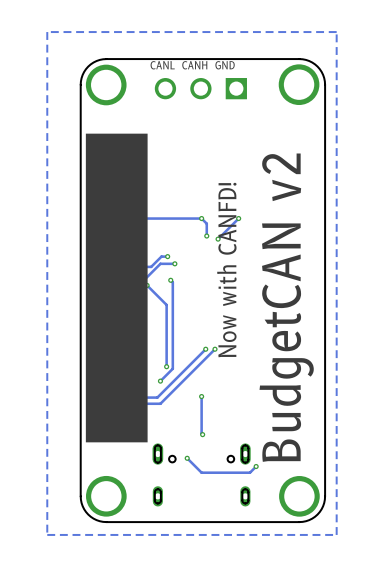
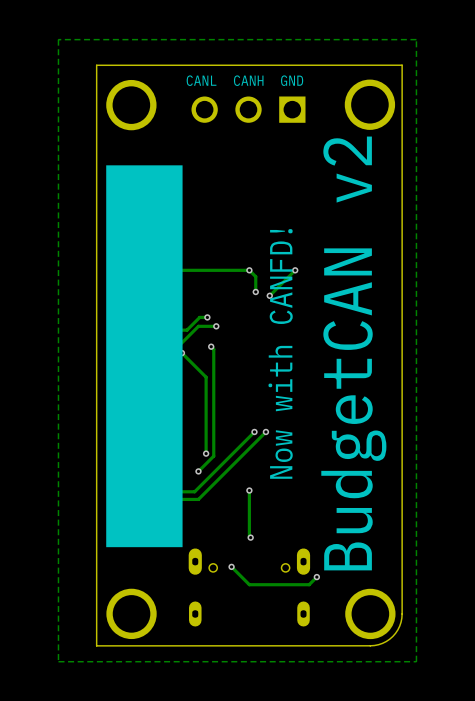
board edge: (325, 84) (323, 74) (317, 66) (309, 61) (299, 59) (106, 59) (93, 62) (84, 71) (80, 84) (80, 496) (82, 506) (88, 514) (96, 520) (106, 522) -> (402, 104) (402, 65) (96, 65) (96, 645) (131, 645)

